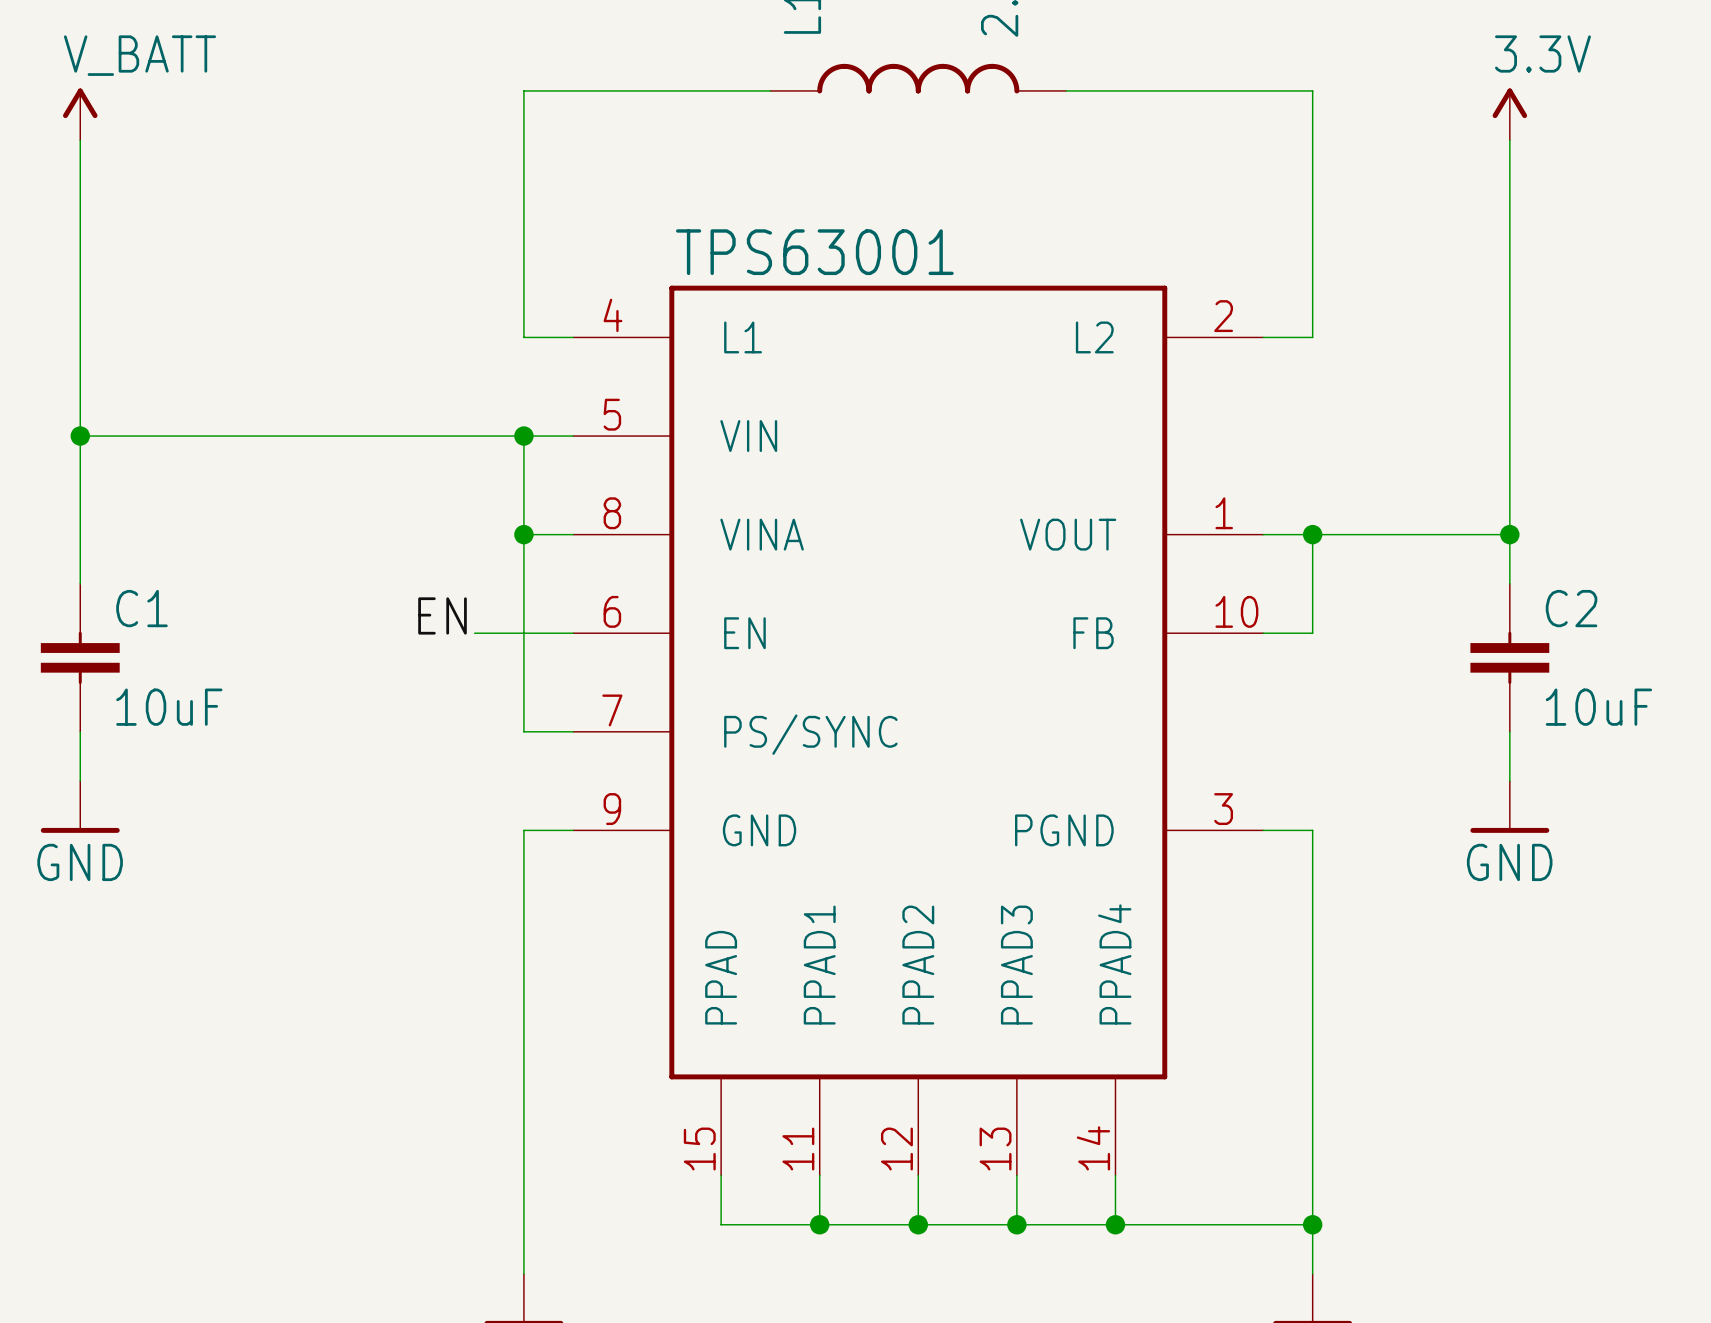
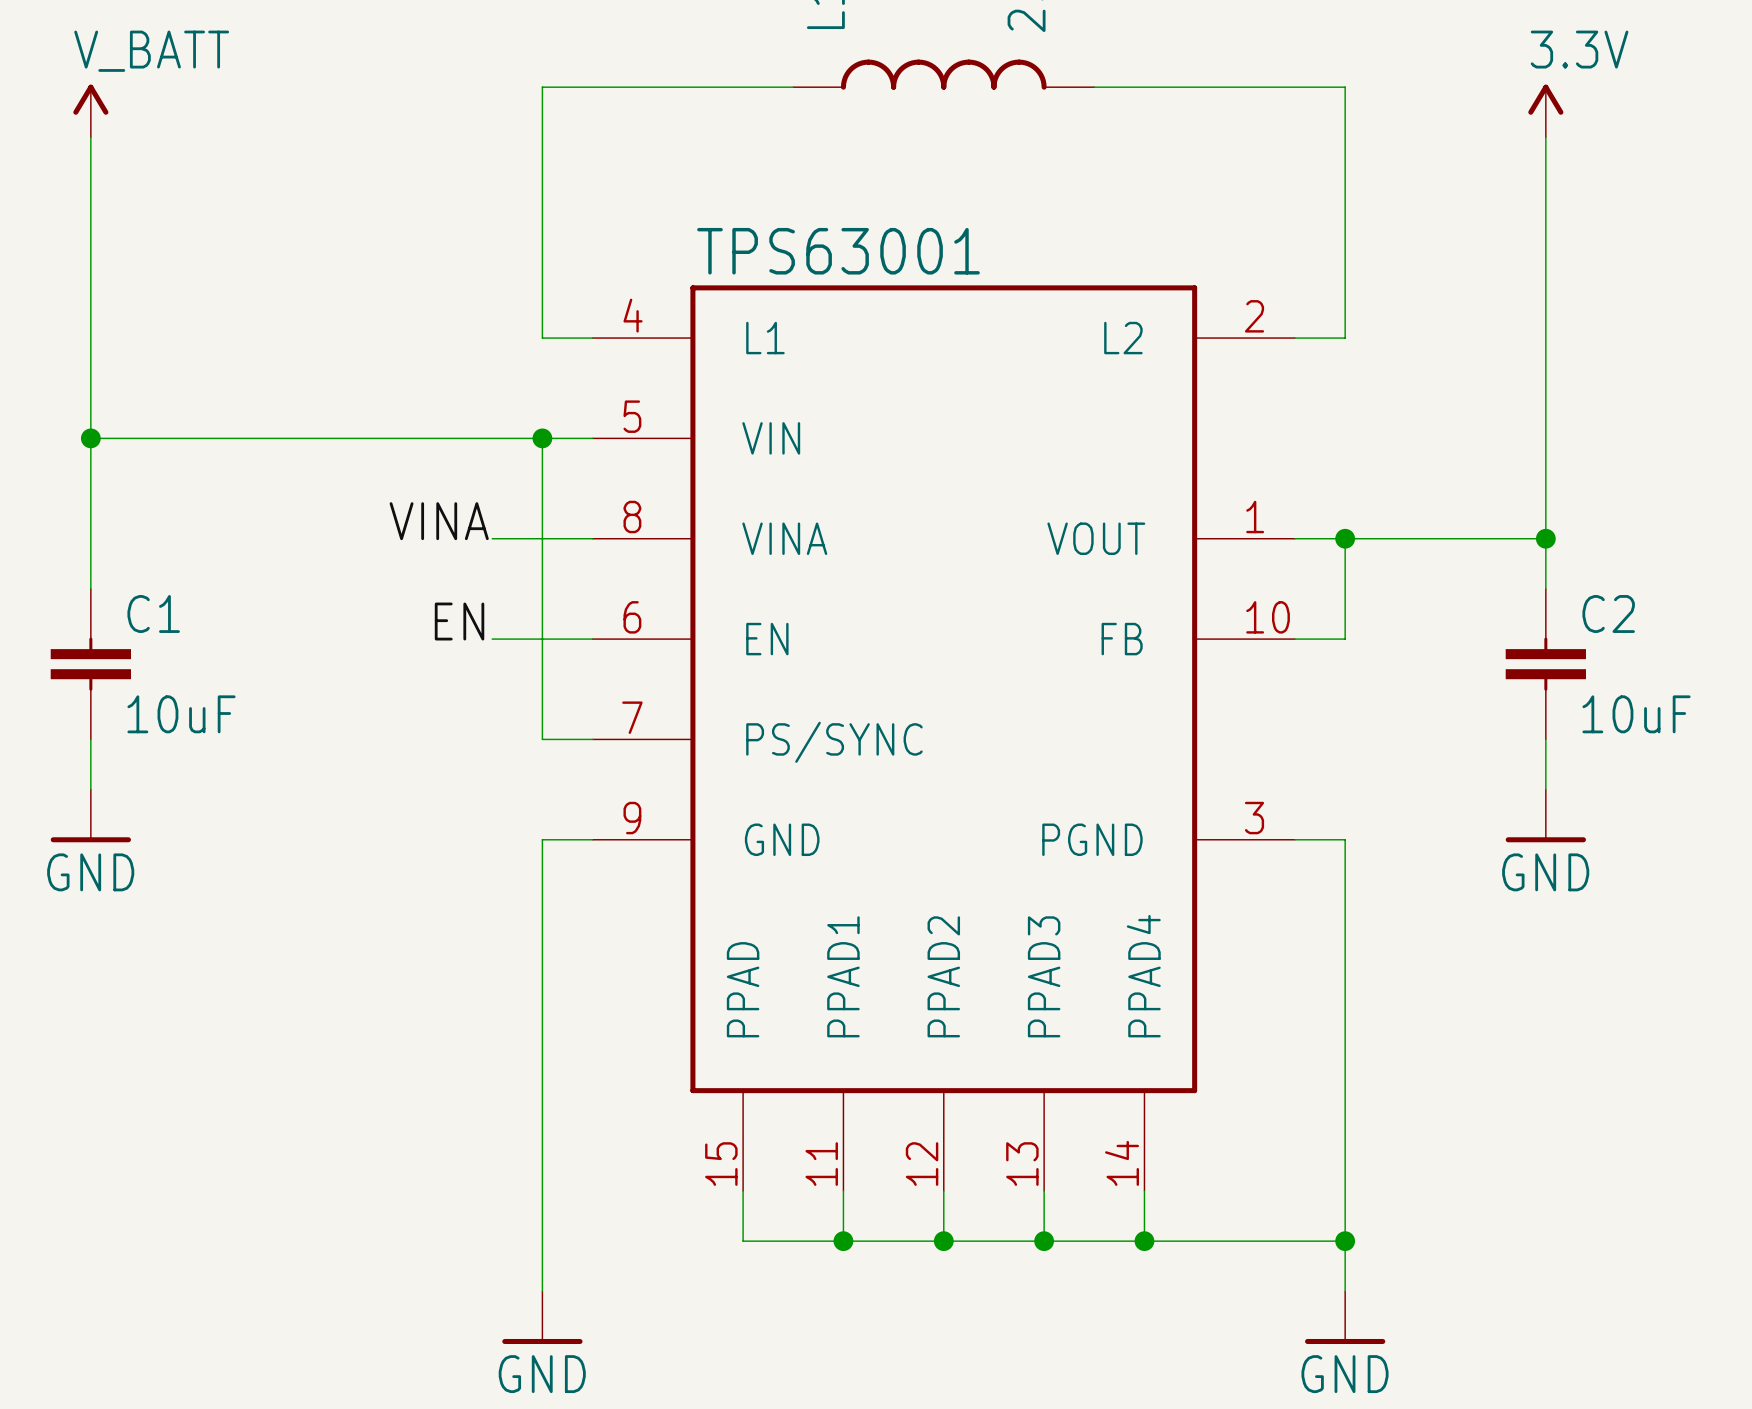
label: none -> VINA (439, 521)
wire: none -> (492, 538) (542, 538)
junction: (523, 534) -> none

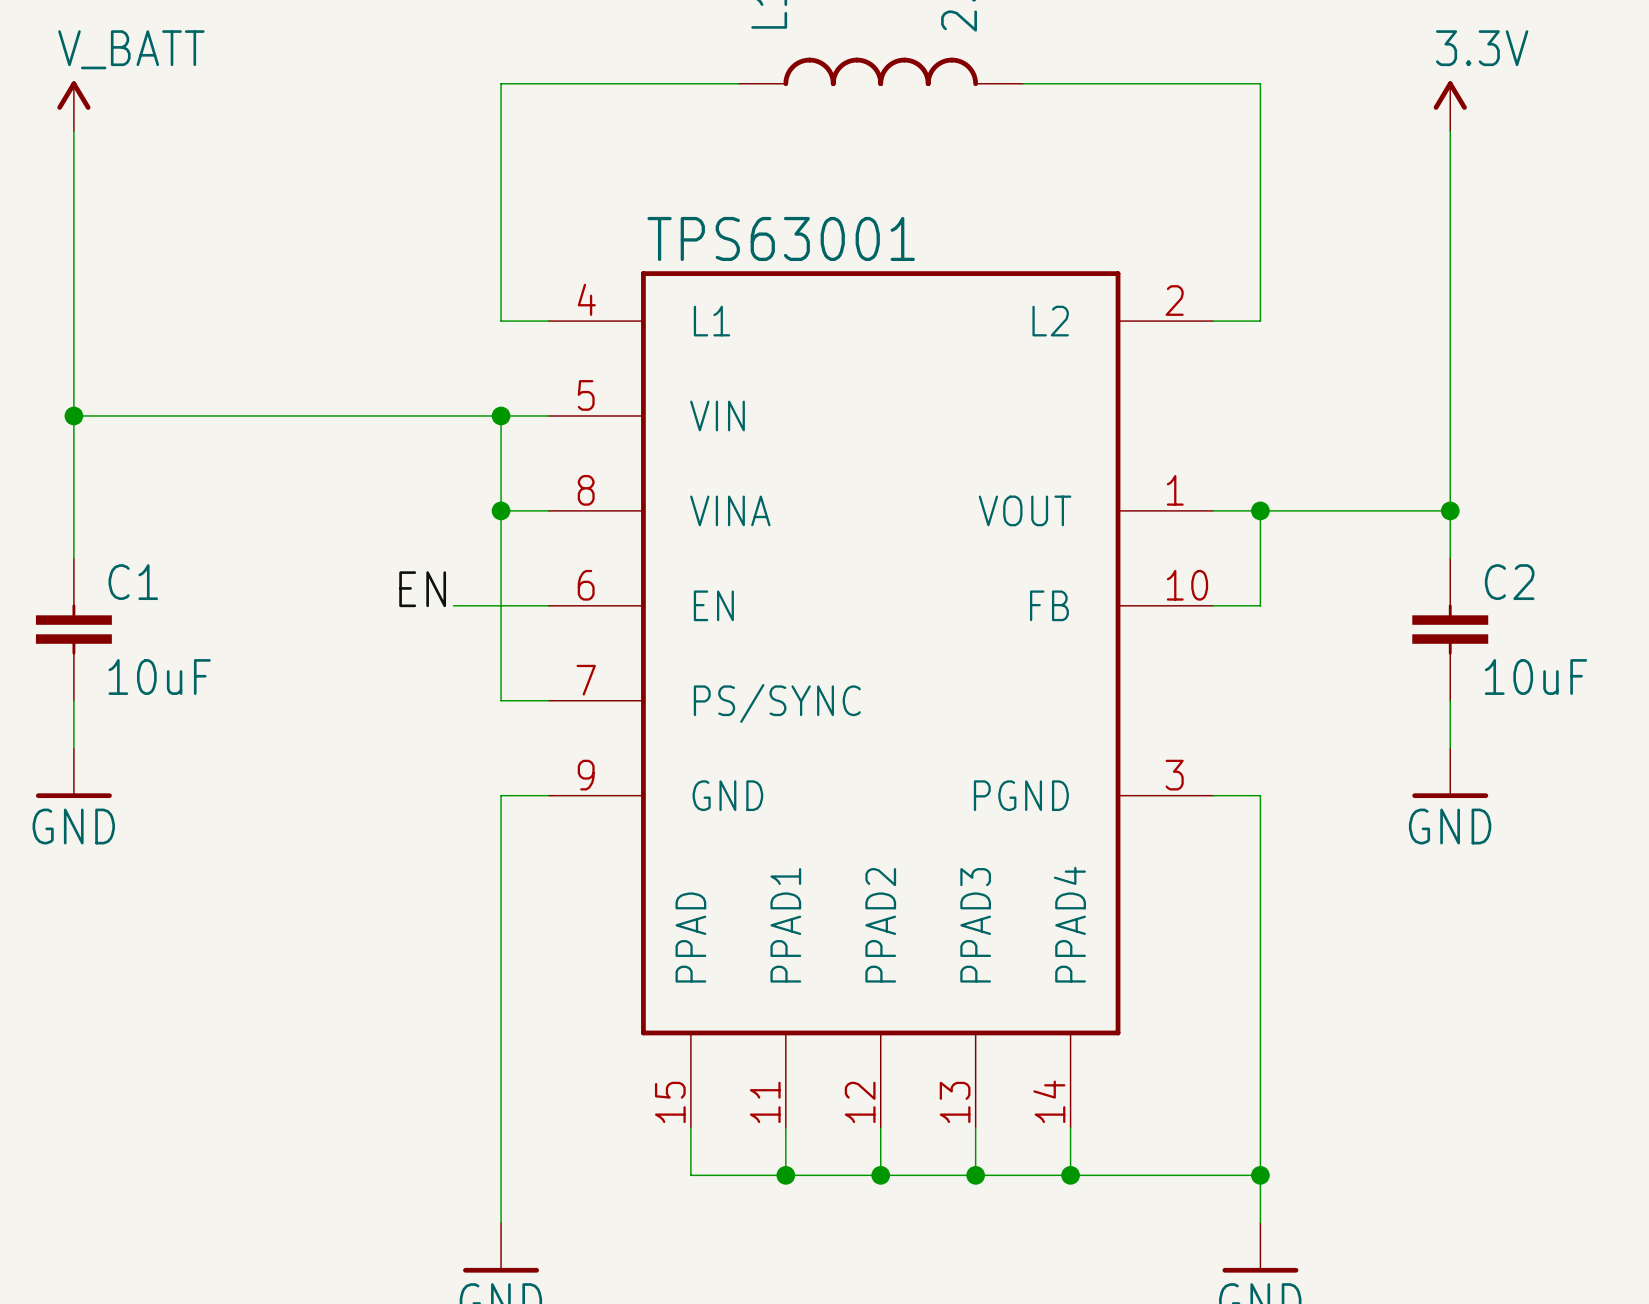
label: VINA (439, 521) -> none
wire: (492, 538) (542, 538) -> none
junction: none -> (501, 510)

